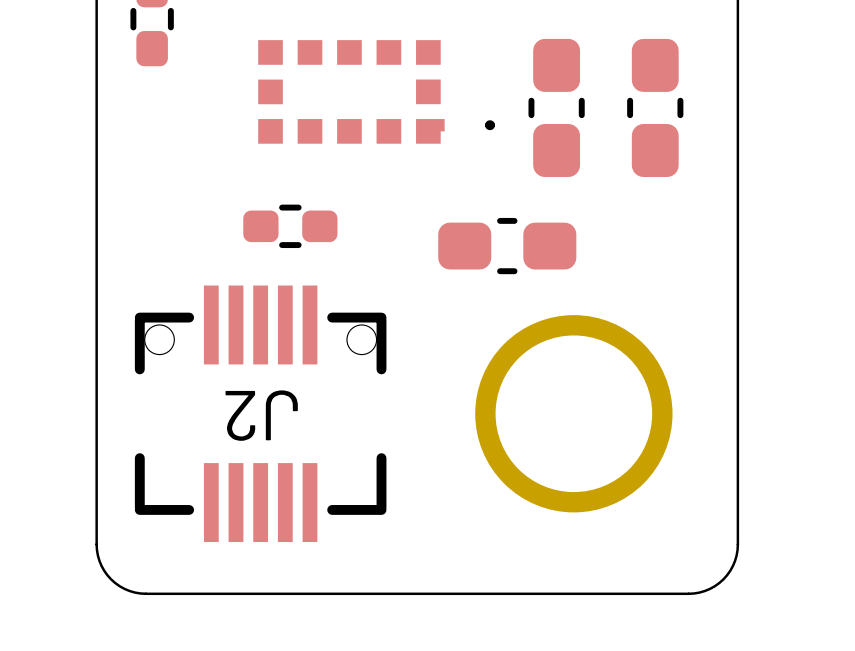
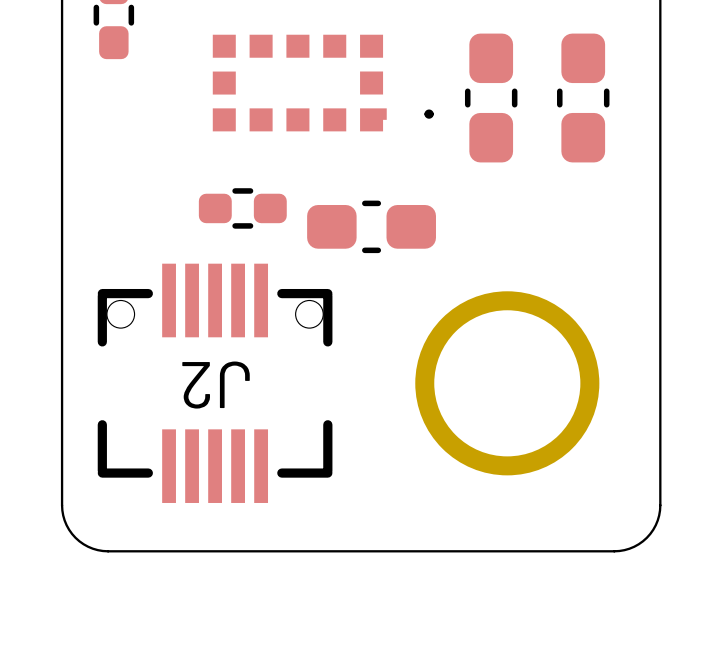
part position: (507, 246) -> (371, 226)

